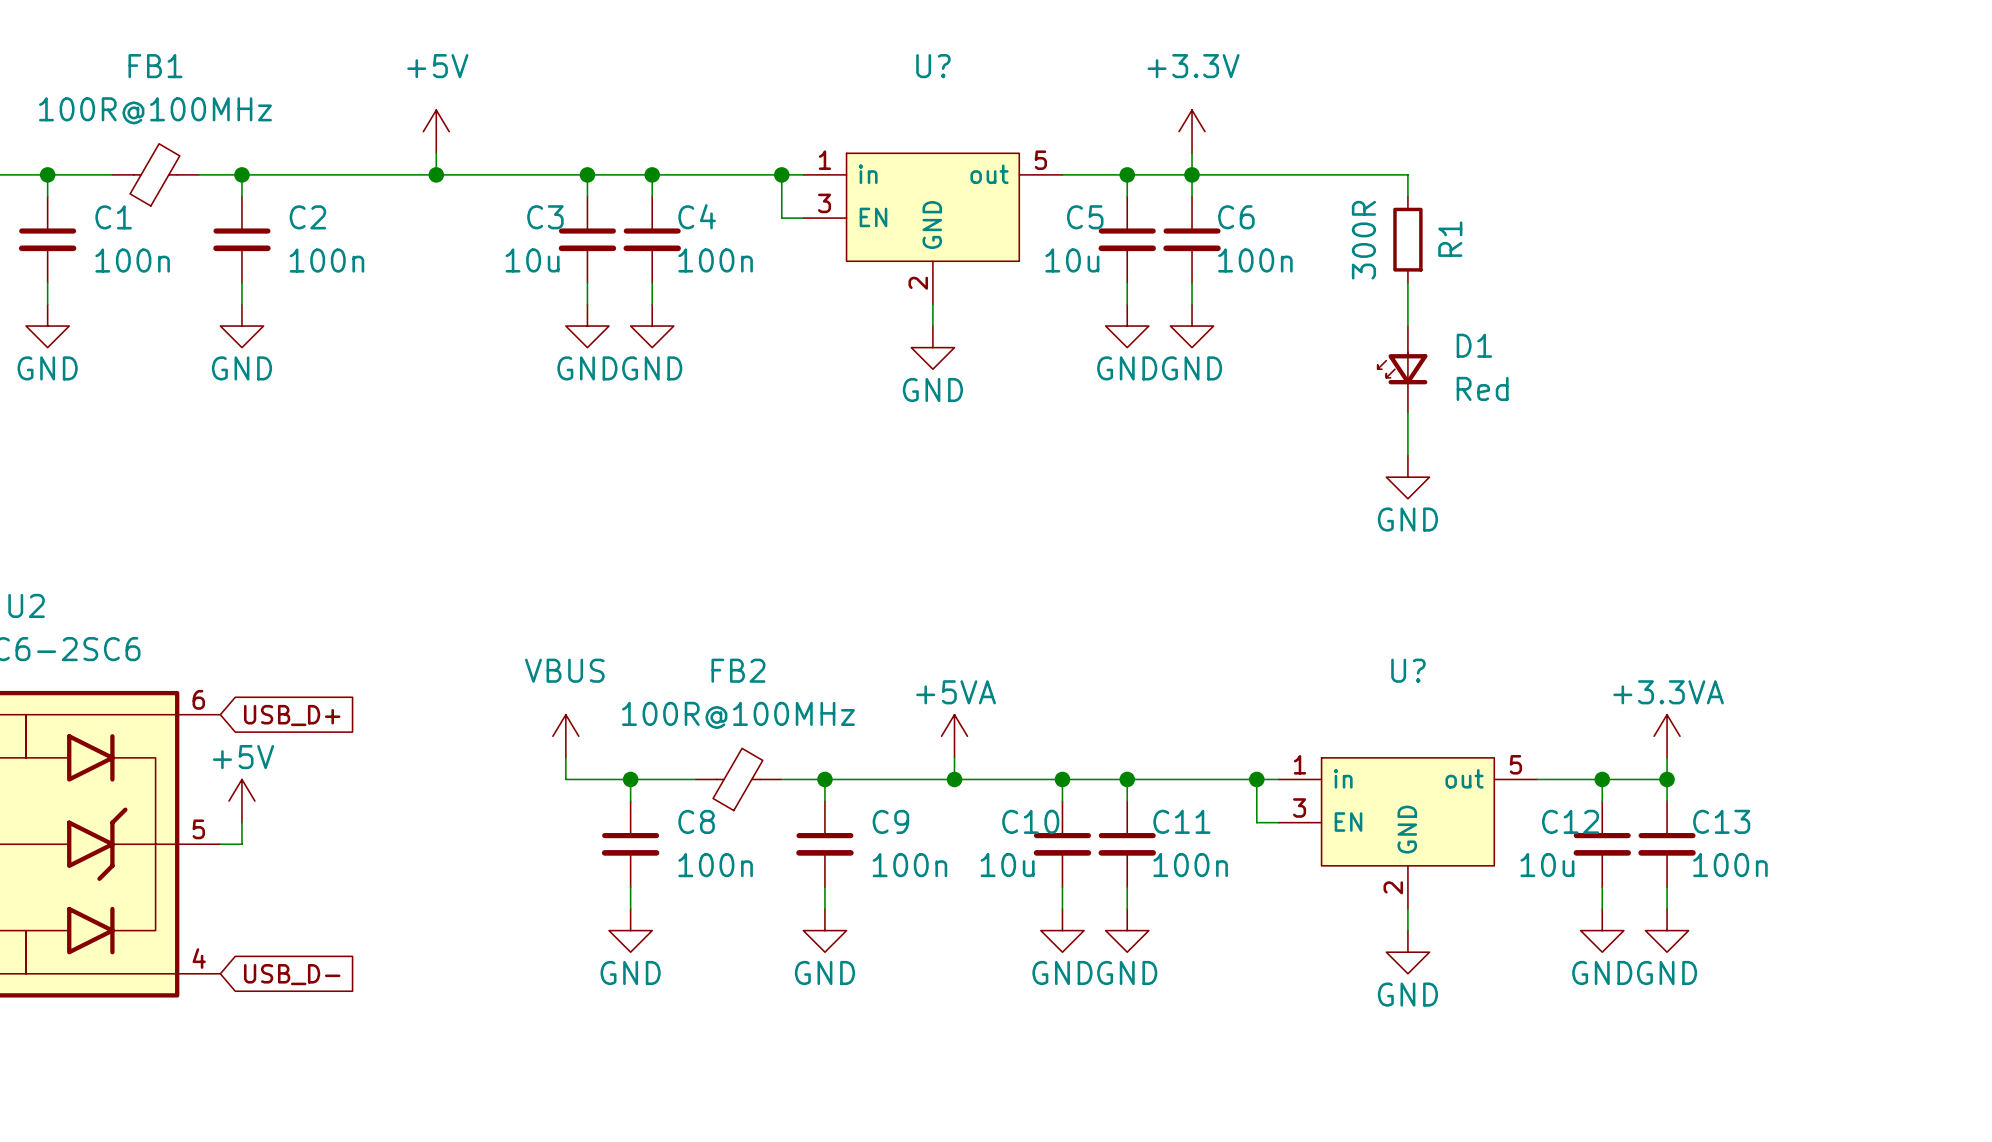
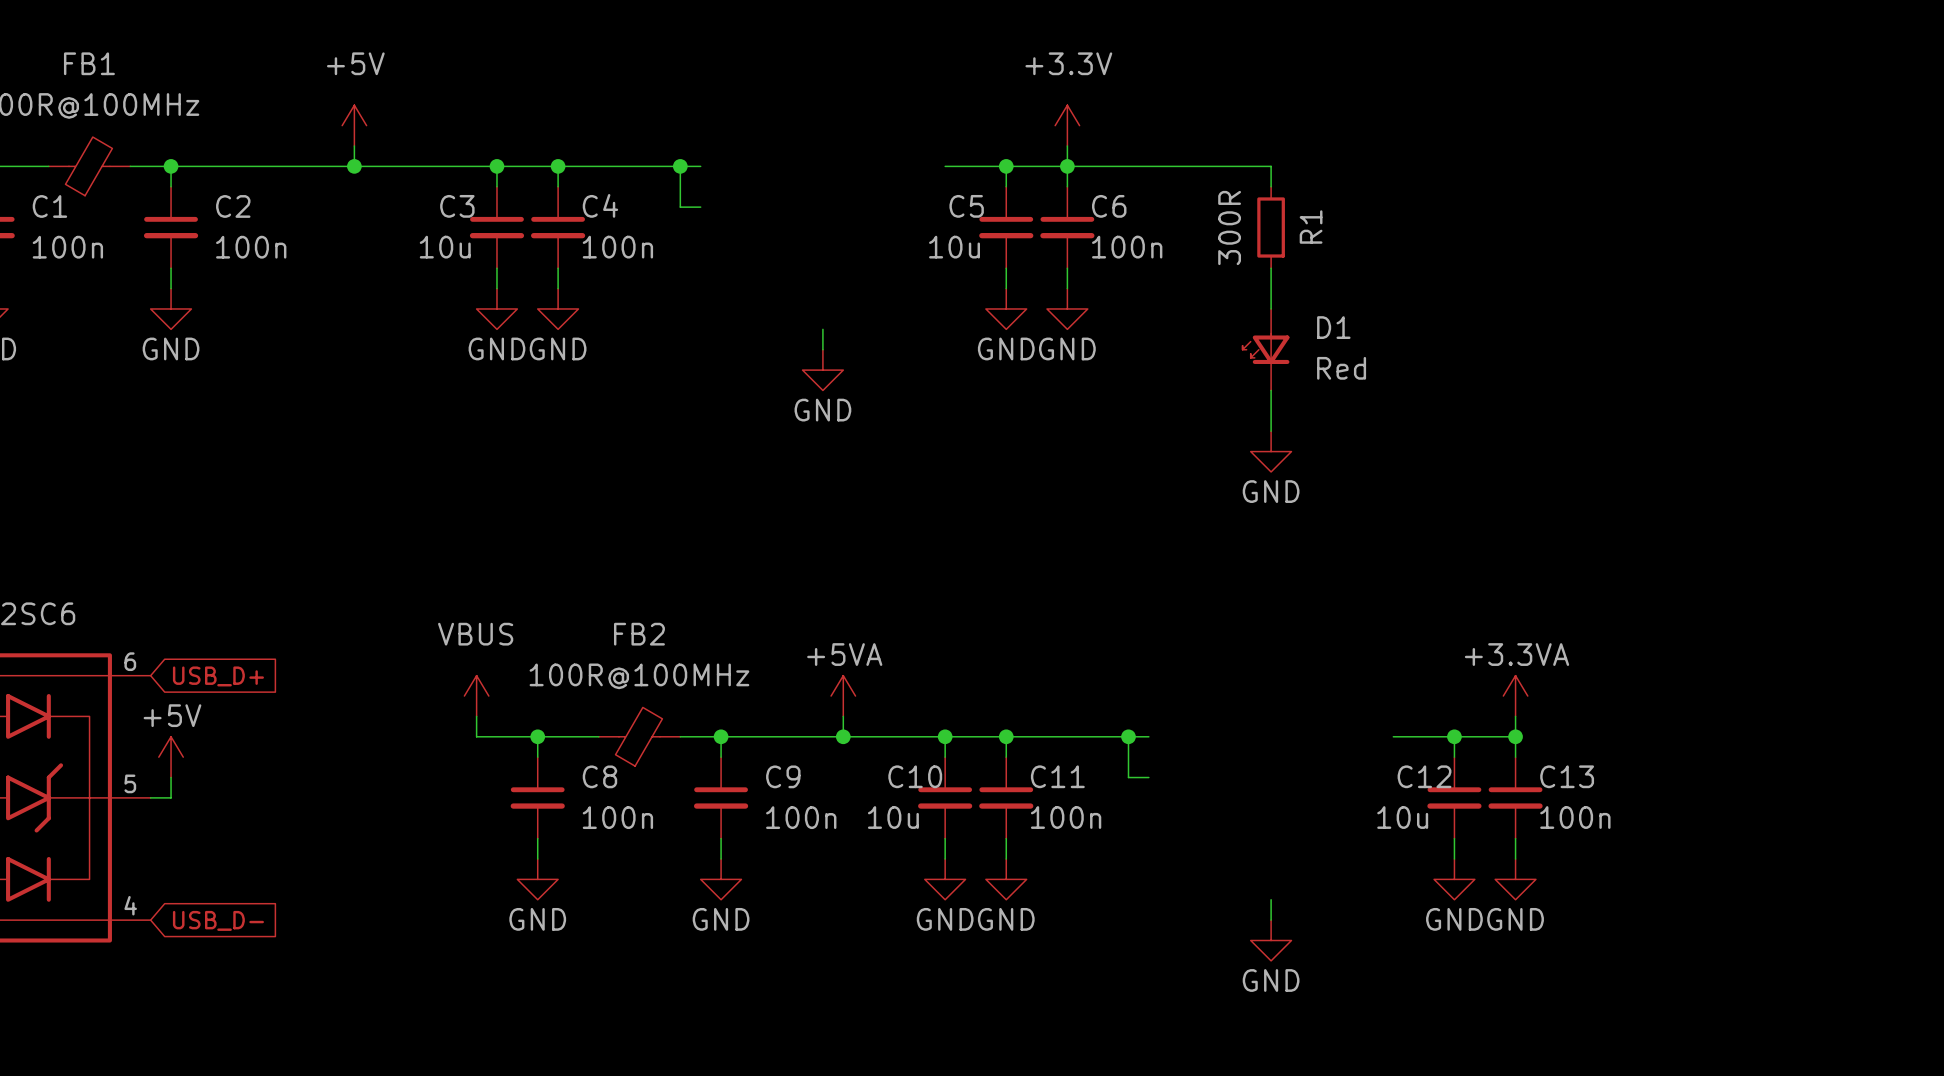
U?: (932, 228) -> none
wire: (932, 304) (932, 326) -> (822, 329) (822, 349)
power symbol position: GND (932, 347) -> GND (822, 370)
U?: (1407, 833) -> none
wire: (1407, 909) (1407, 930) -> (1271, 899) (1271, 920)
power symbol position: GND (1407, 952) -> GND (1271, 940)

